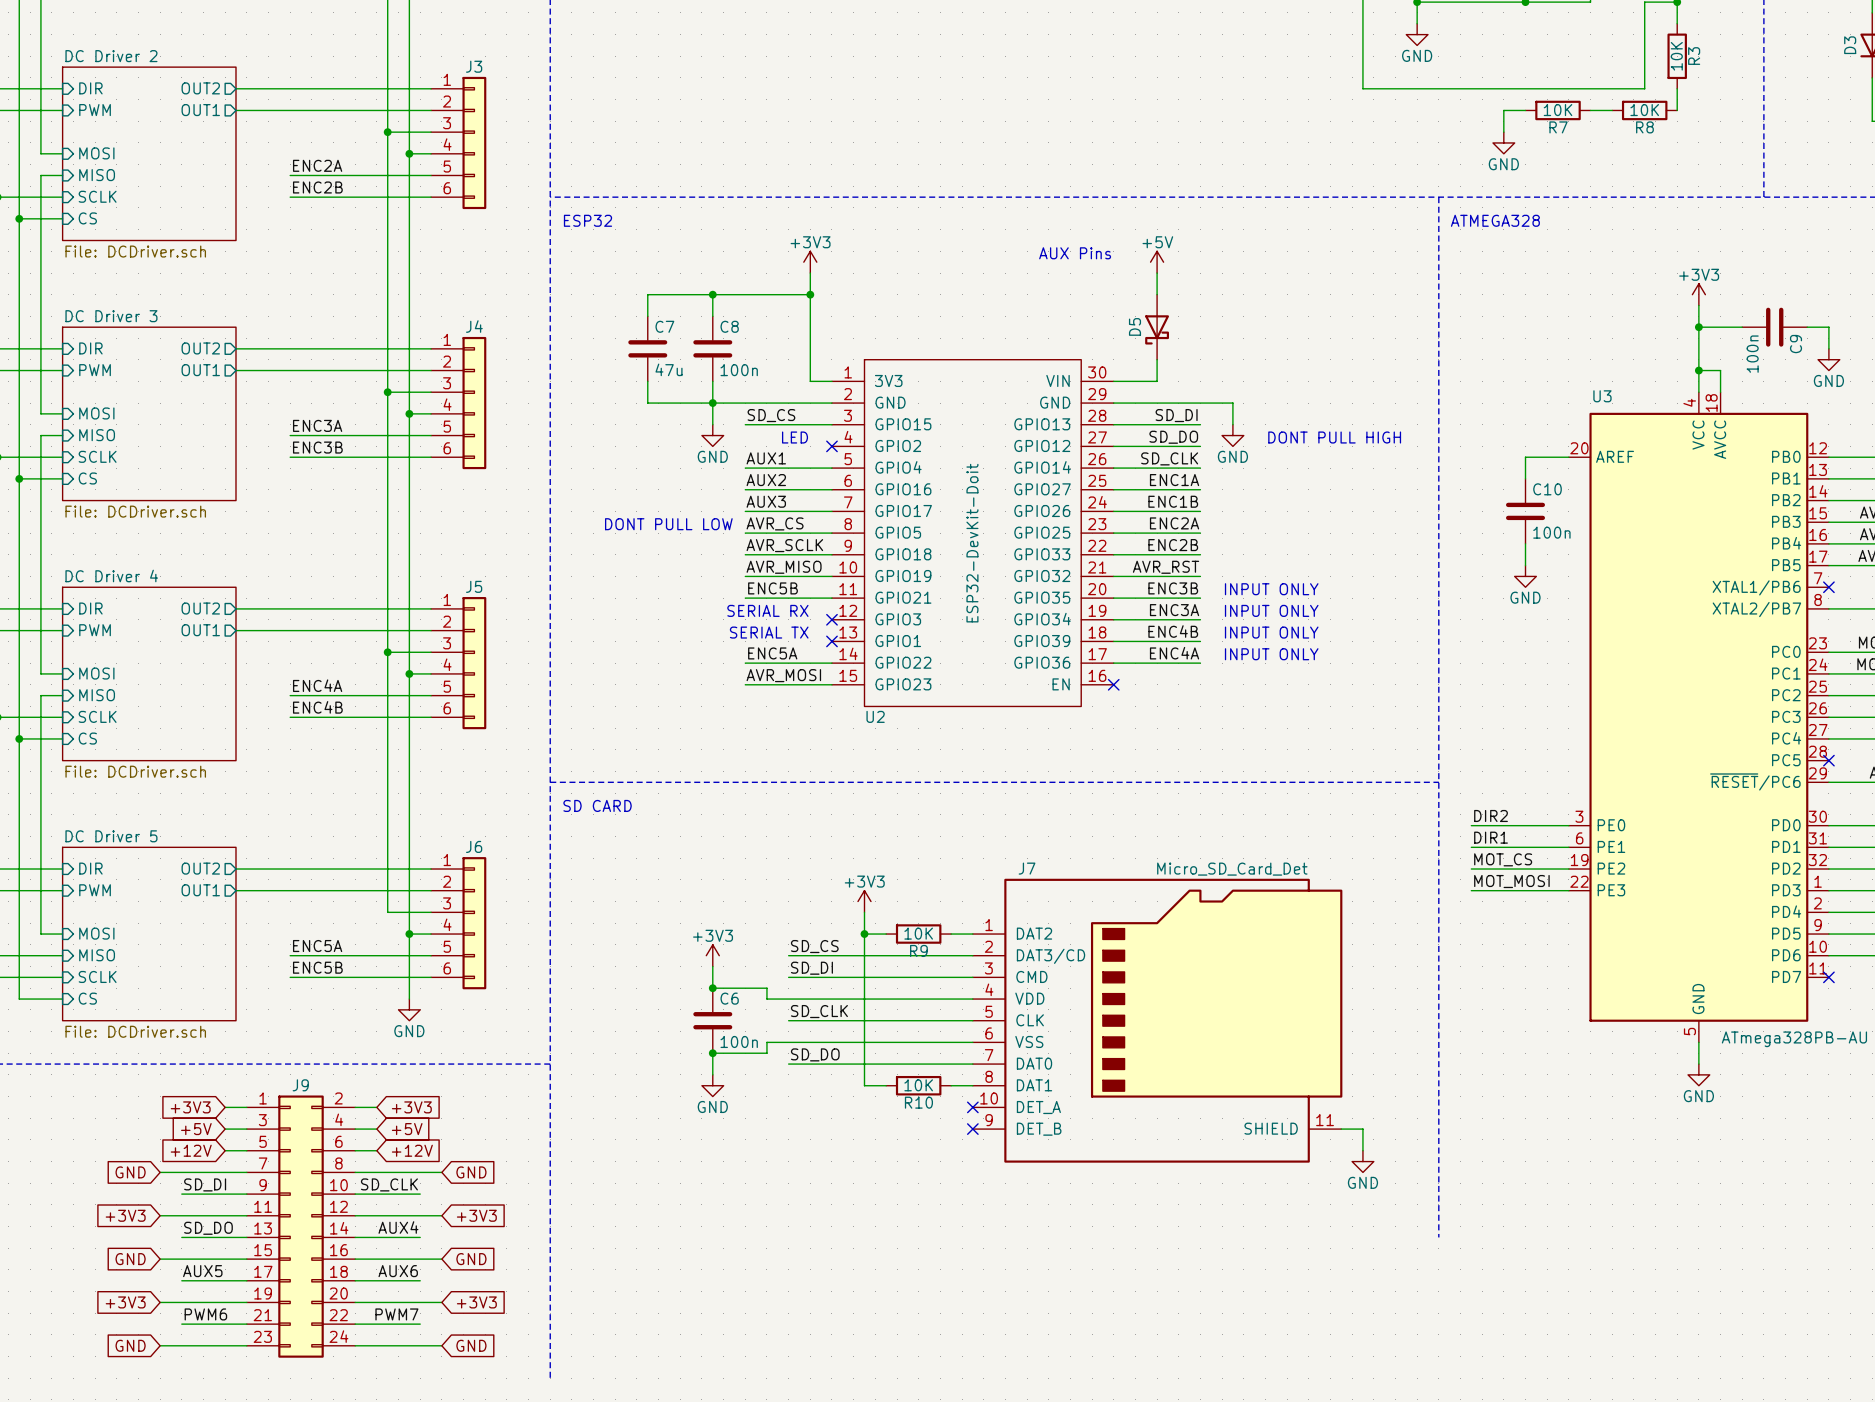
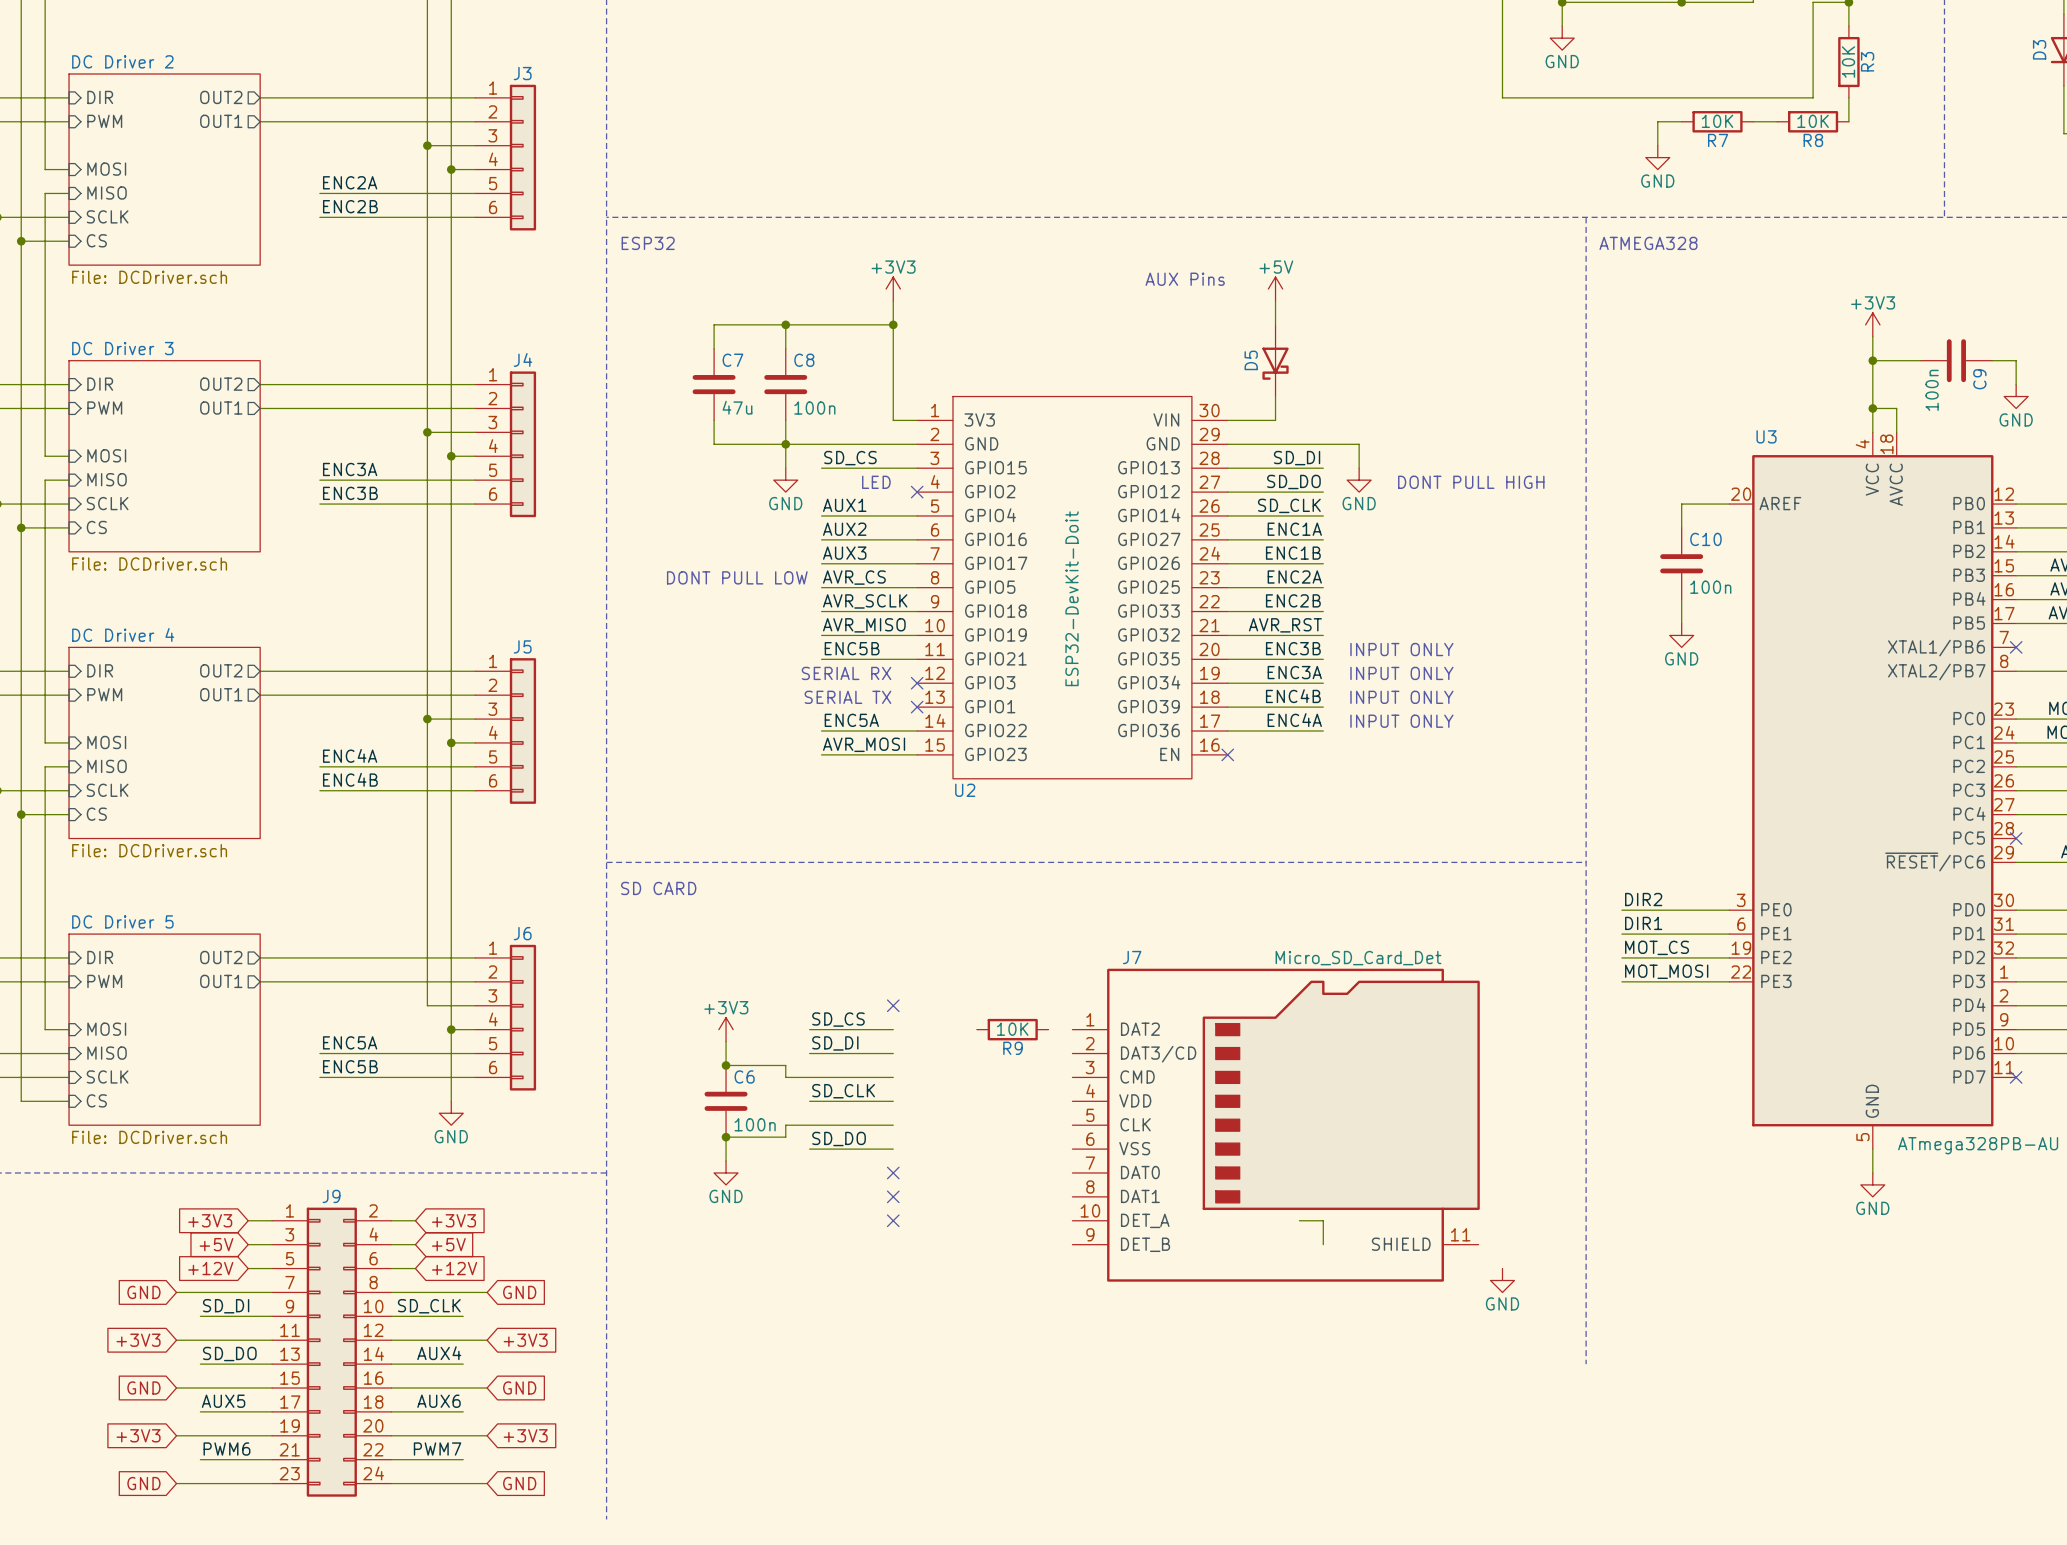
power symbol: +3V3 (864, 901) -> none
no-connect mark: none -> (893, 1005)
wire: (864, 912) (864, 1085) (886, 1085) -> none
wire: none -> (809, 1029) (893, 1029)
wire: (864, 934) (886, 934) -> none
junction: (864, 934) -> none
wire: (951, 934) (972, 934) -> none
wire: none -> (726, 1041) (726, 1065) (785, 1065)
label position: SD_CS (814, 946) -> SD_CS (838, 1019)
power symbol position: +3V3 (712, 955) -> +3V3 (726, 1029)
wire: none -> (809, 1053) (869, 1053)
wire: (810, 955) (972, 955) -> none
junction: none -> (726, 1065)
label position: SD_DI (811, 968) -> SD_DI (835, 1043)
wire: (712, 977) (712, 988) (766, 988) (766, 999) -> (785, 1077) (869, 1077)
wire: (810, 977) (972, 977) -> none
junction: (712, 988) -> none
wire: none -> (809, 1101) (845, 1101)
wire: (810, 999) (972, 999) -> none
label position: SD_CLK (819, 1011) -> SD_CLK (843, 1091)
C6 position: (712, 1020) -> (726, 1101)
wire: none -> (869, 1125) (785, 1125) (785, 1137) (726, 1137) (726, 1161)
wire: (810, 1020) (972, 1020) -> none
junction: none -> (726, 1137)
wire: (766, 1042) (766, 1053) (712, 1053) (712, 1074) -> (845, 1149) (809, 1149)
wire: (810, 1042) (972, 1042) -> none
junction: (712, 1053) -> none
label position: SD_DO (815, 1054) -> SD_DO (839, 1139)
wire: (788, 1064) (972, 1064) -> none
no-connect mark: none -> (893, 1172)
power symbol position: GND (712, 1085) -> GND (726, 1172)
no-connect mark: none -> (893, 1196)
R10: 10K (918, 1085) -> none
wire: (951, 1085) (972, 1085) -> none
no-connect mark: none -> (893, 1220)
no-connect mark: (972, 1107) -> none
no-connect mark: (972, 1129) -> none
wire: (1341, 1129) (1362, 1129) (1362, 1150) -> (1299, 1220) (1323, 1220) (1323, 1244)

